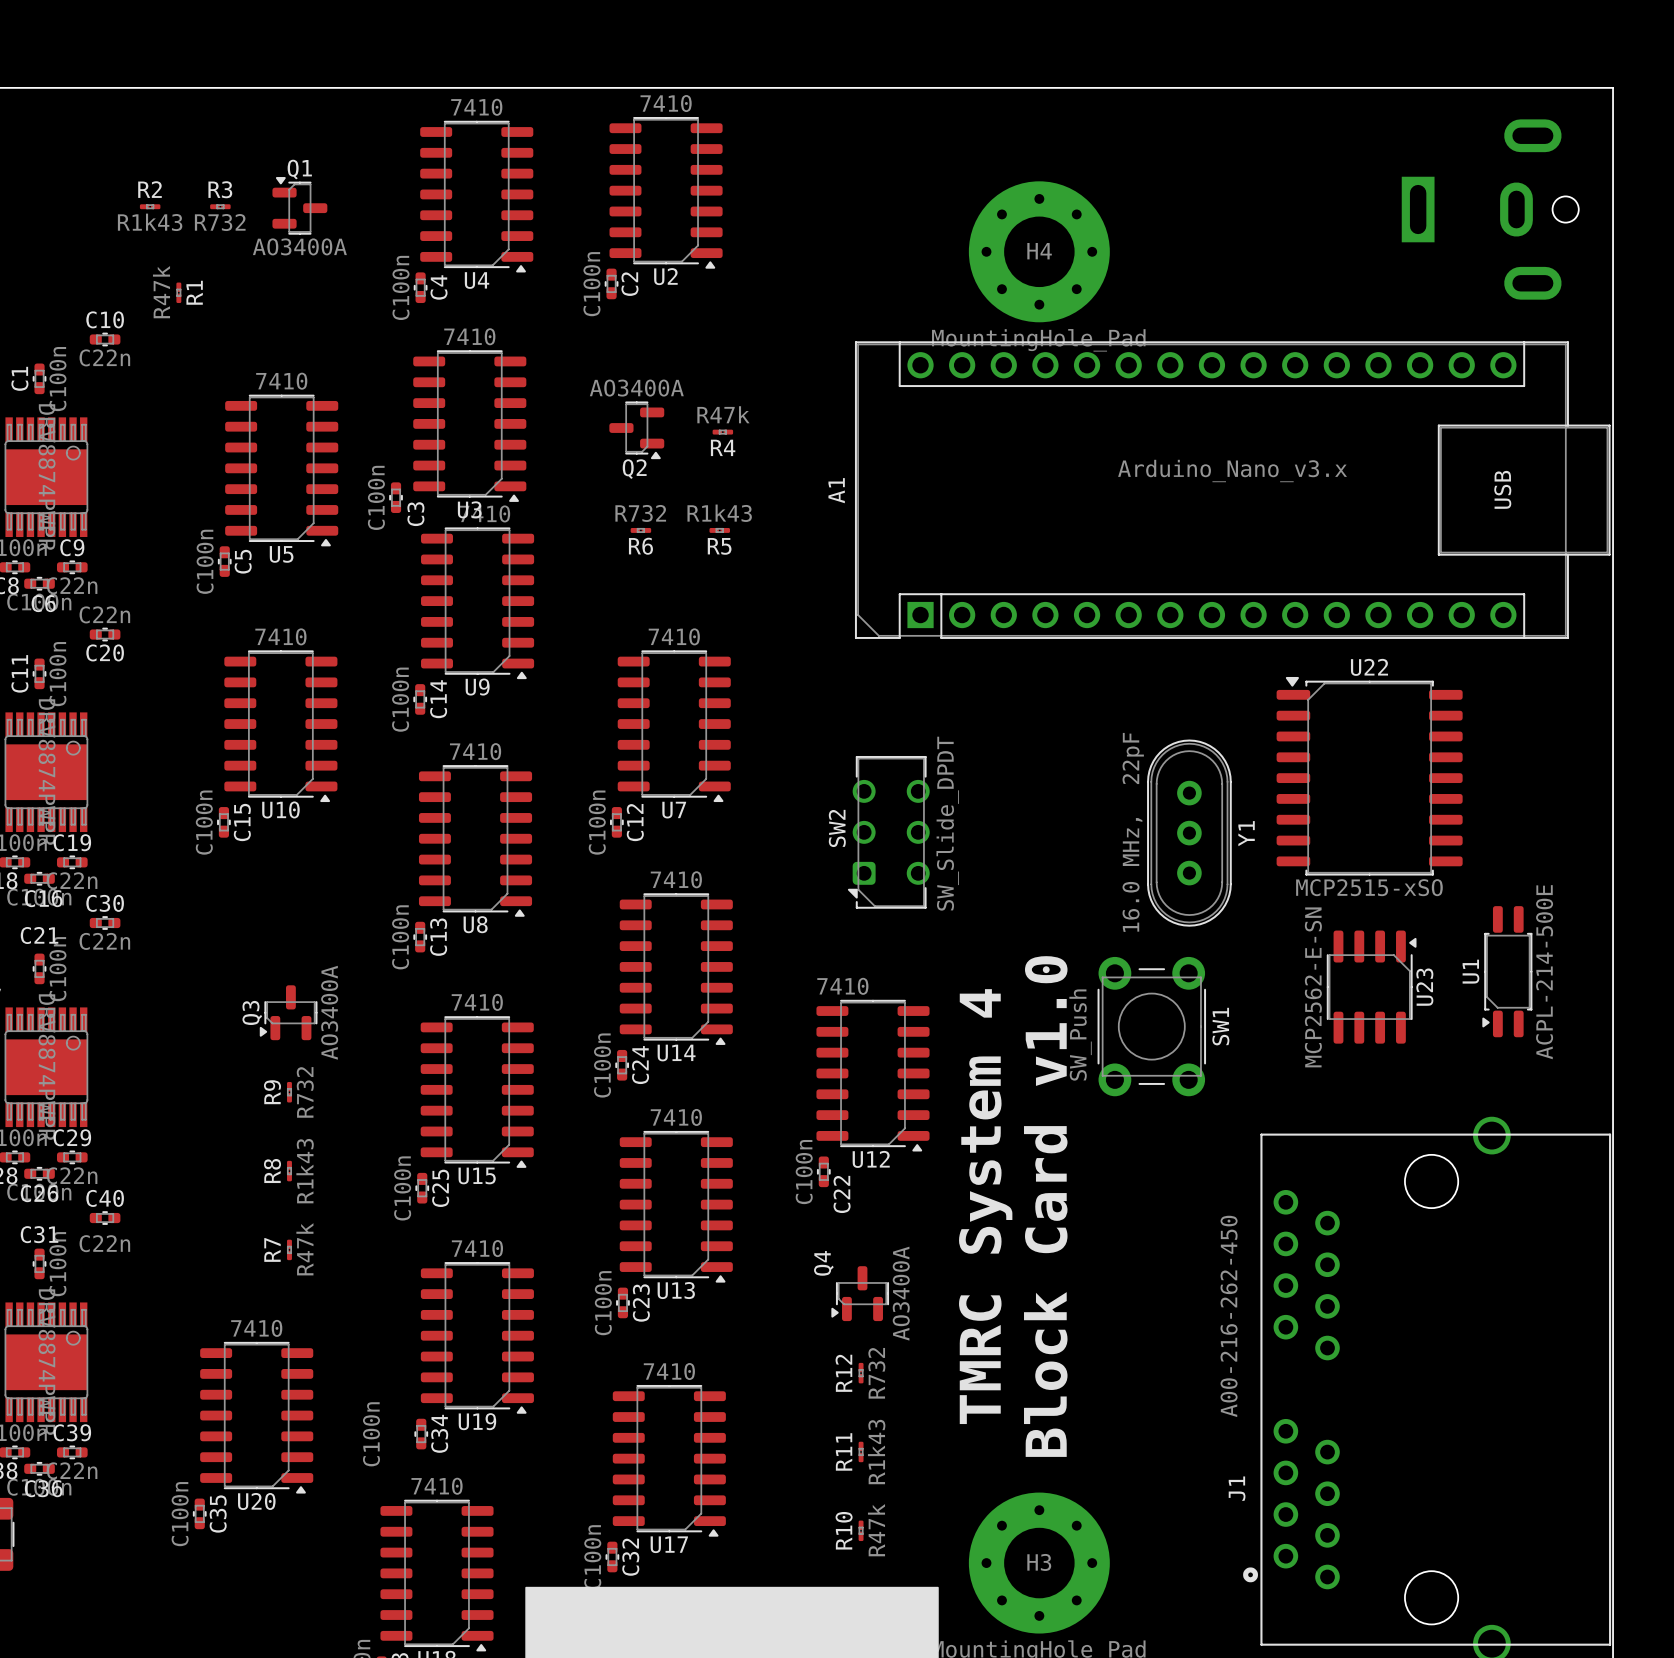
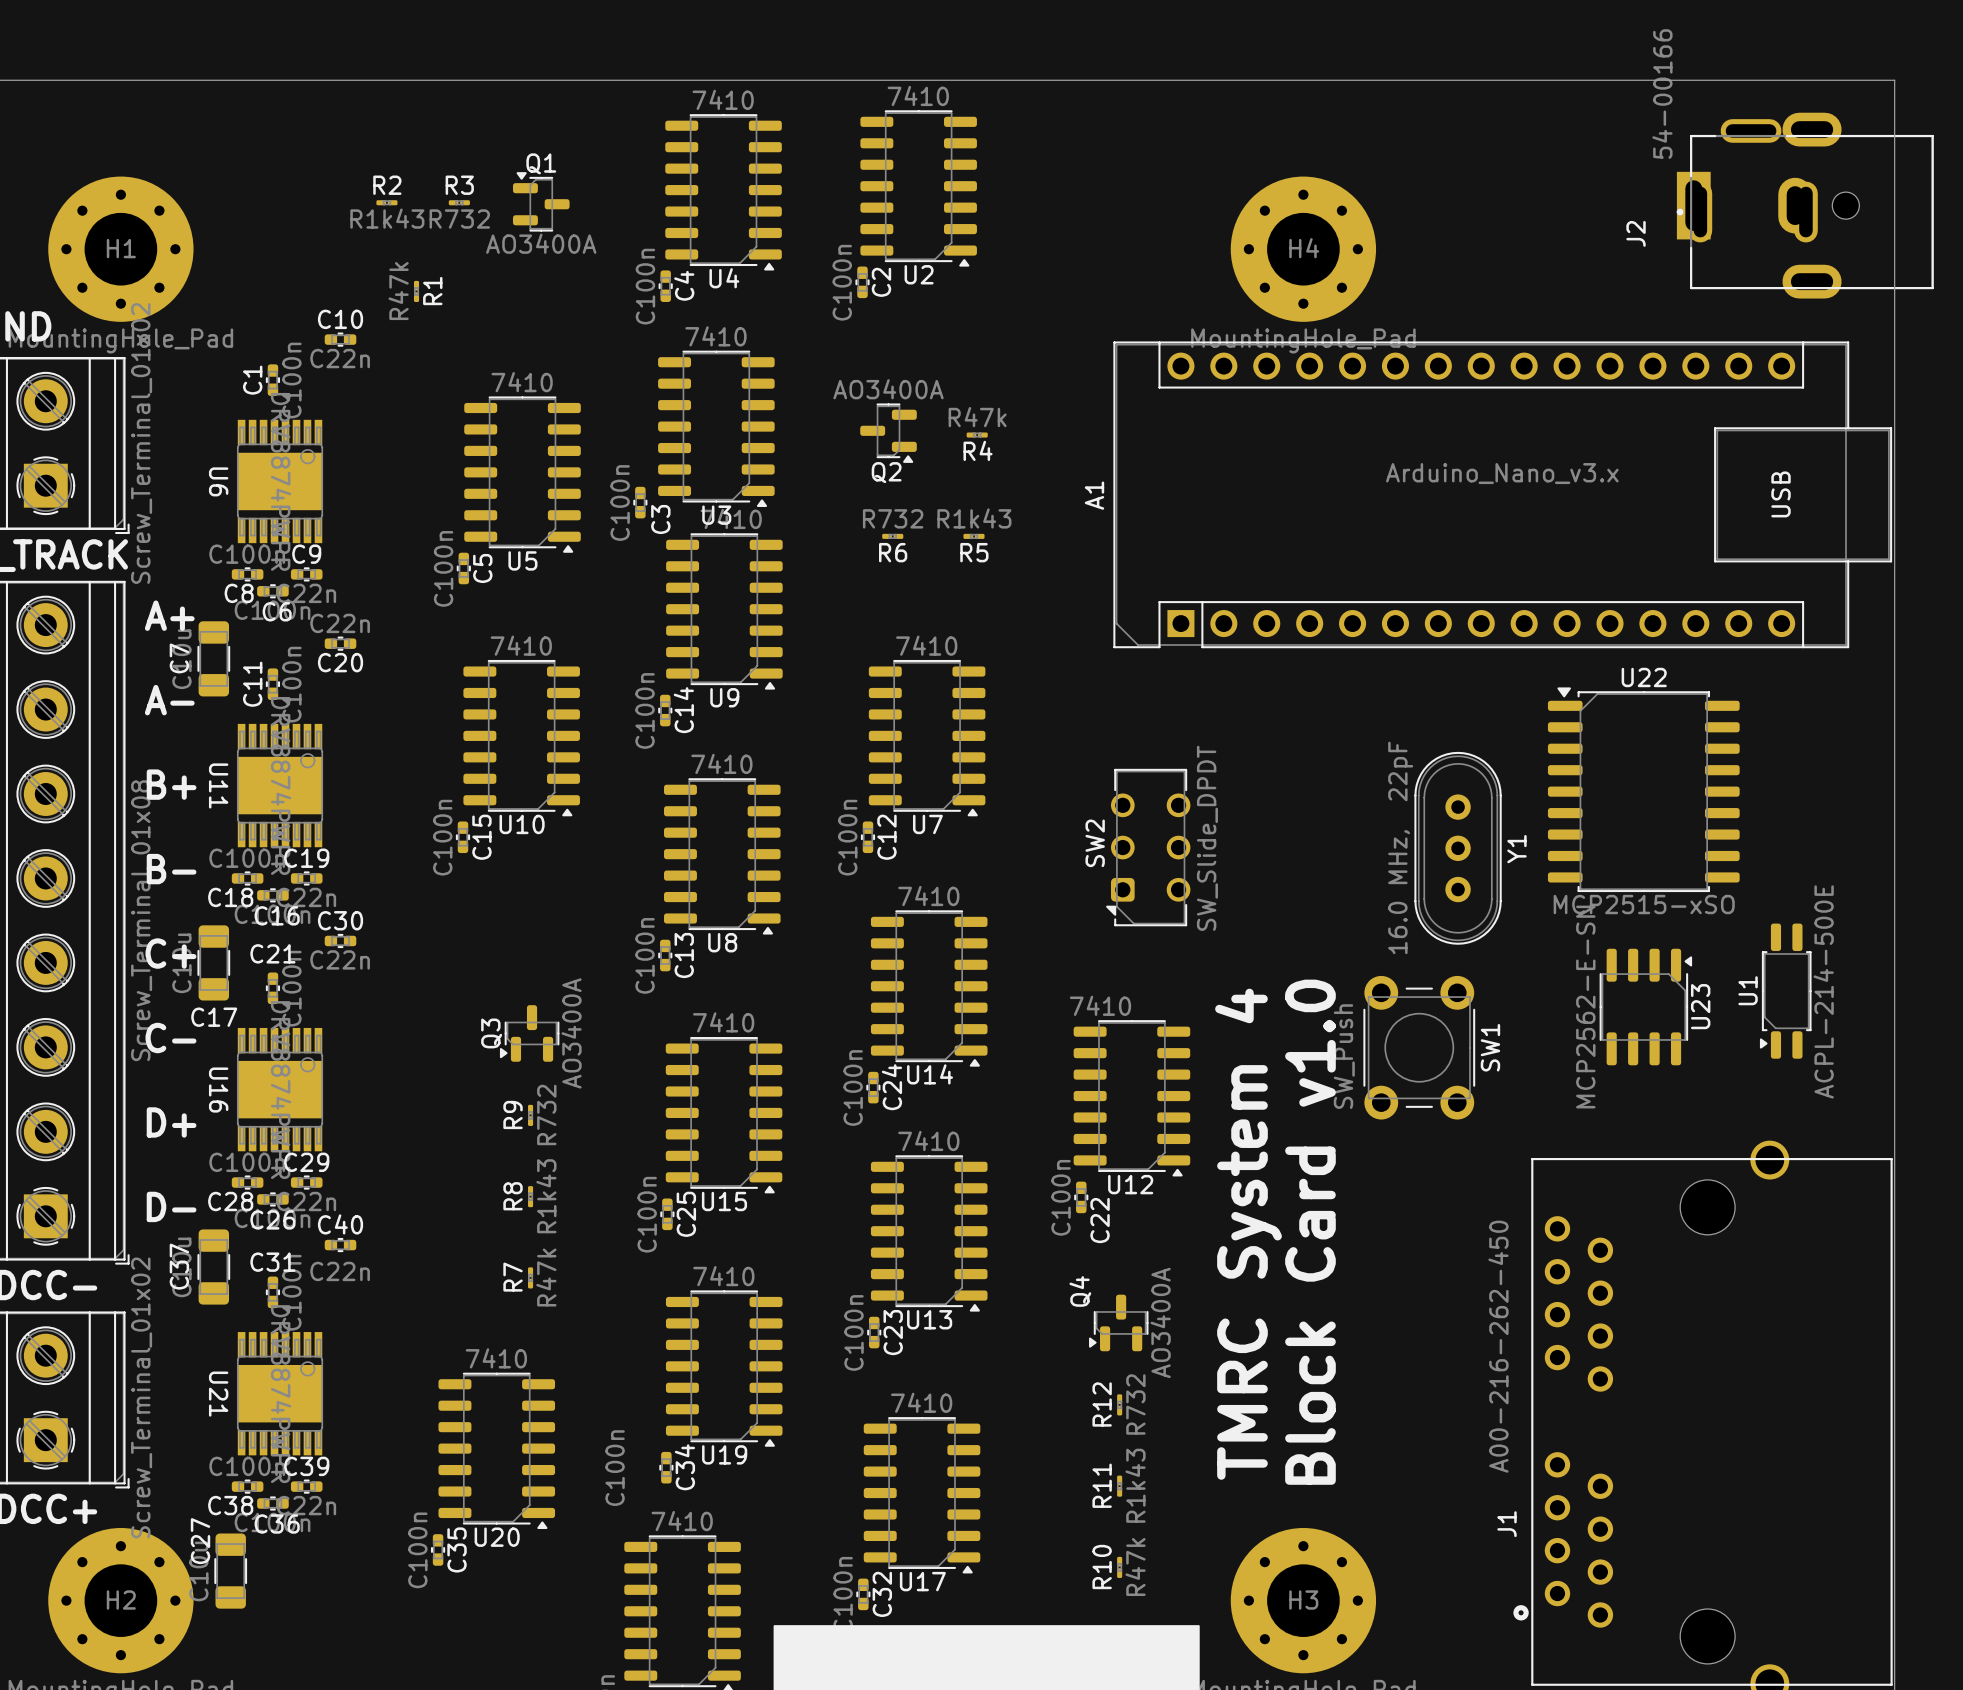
J2: none -> 54-00166 (1805, 204)

